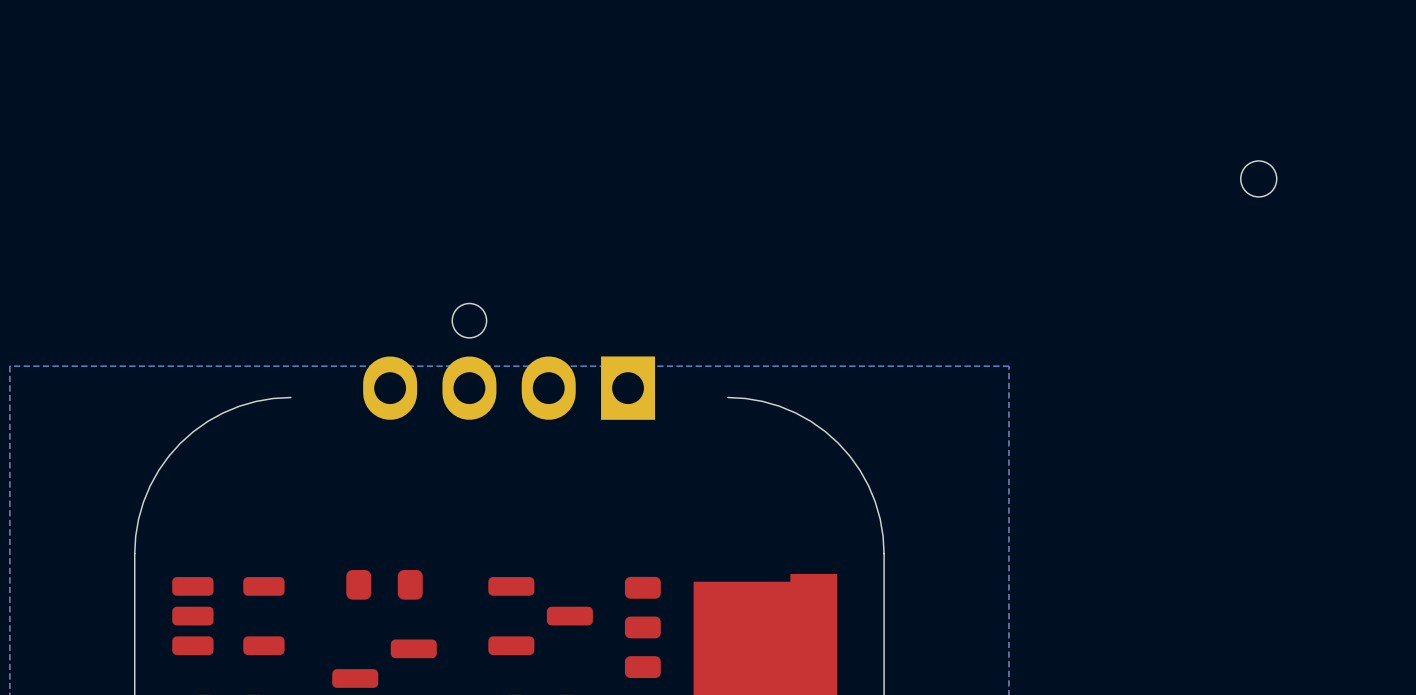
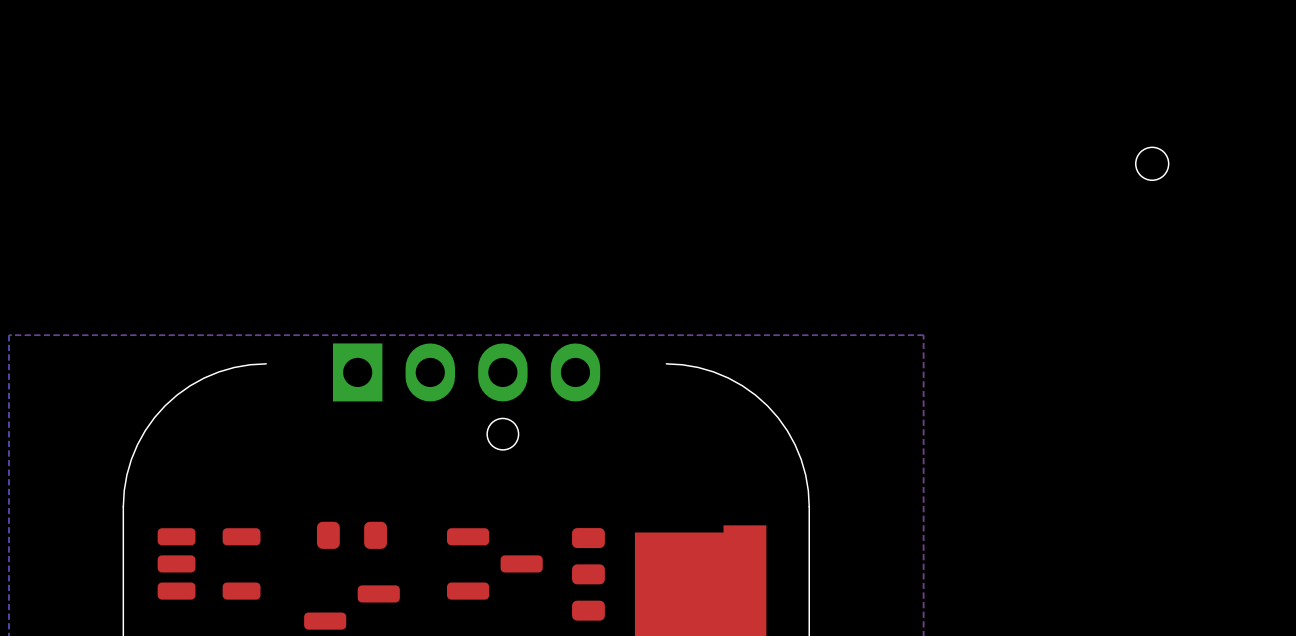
part rotation: 0° (509, 361) -> 180° (466, 396)

